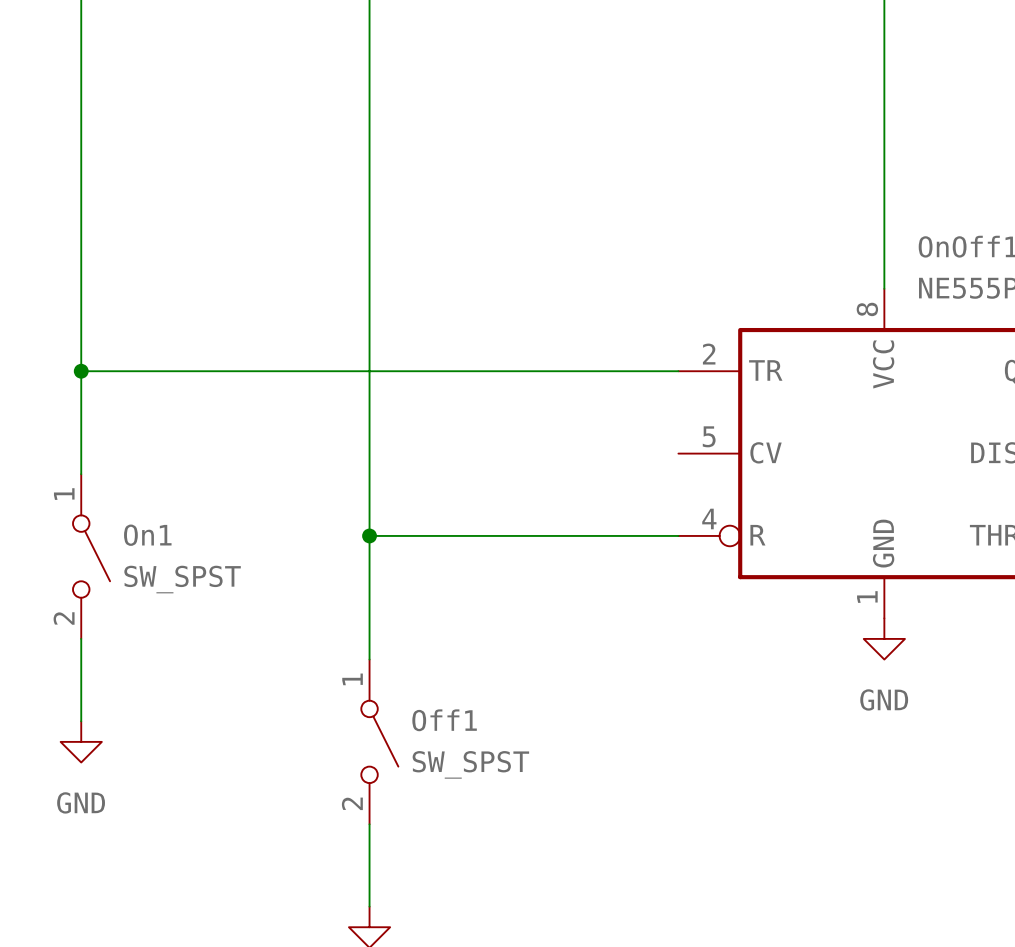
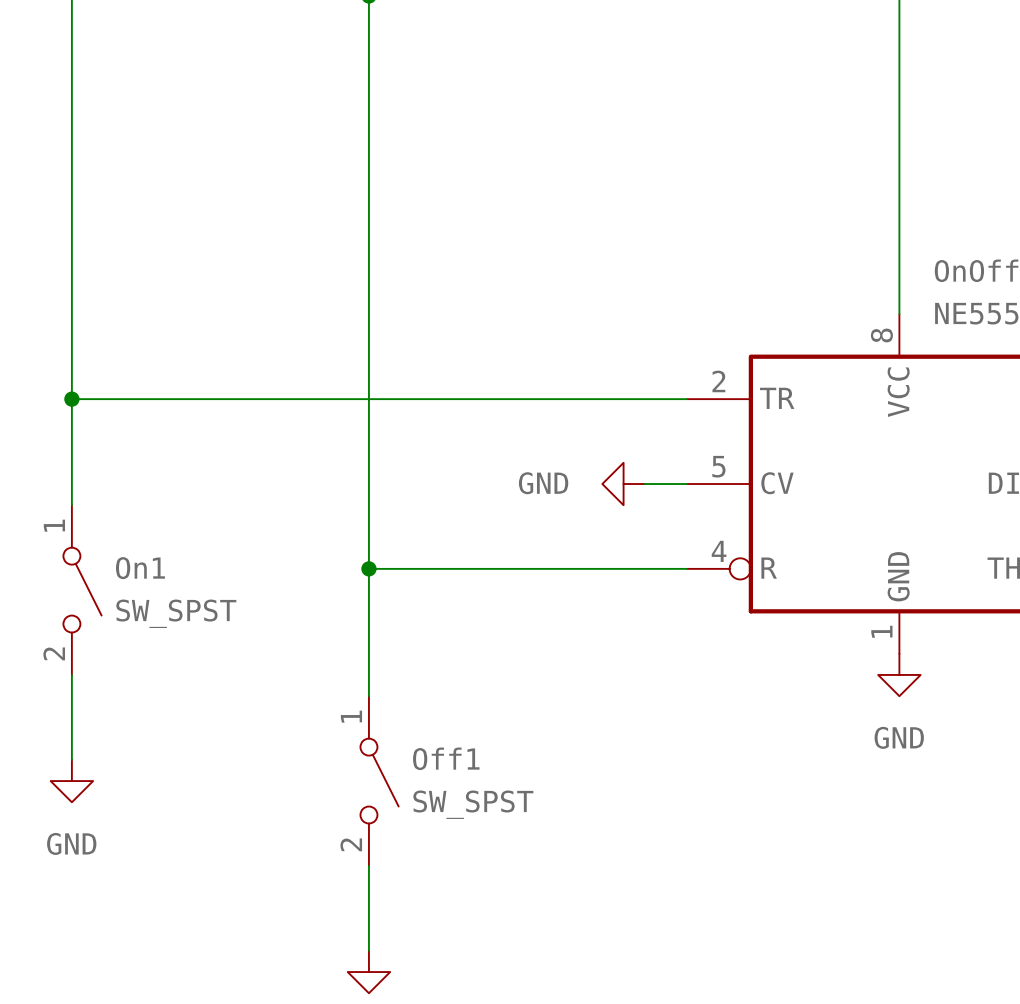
power symbol: none -> GND (623, 484)
wire: none -> (644, 484) (687, 484)

